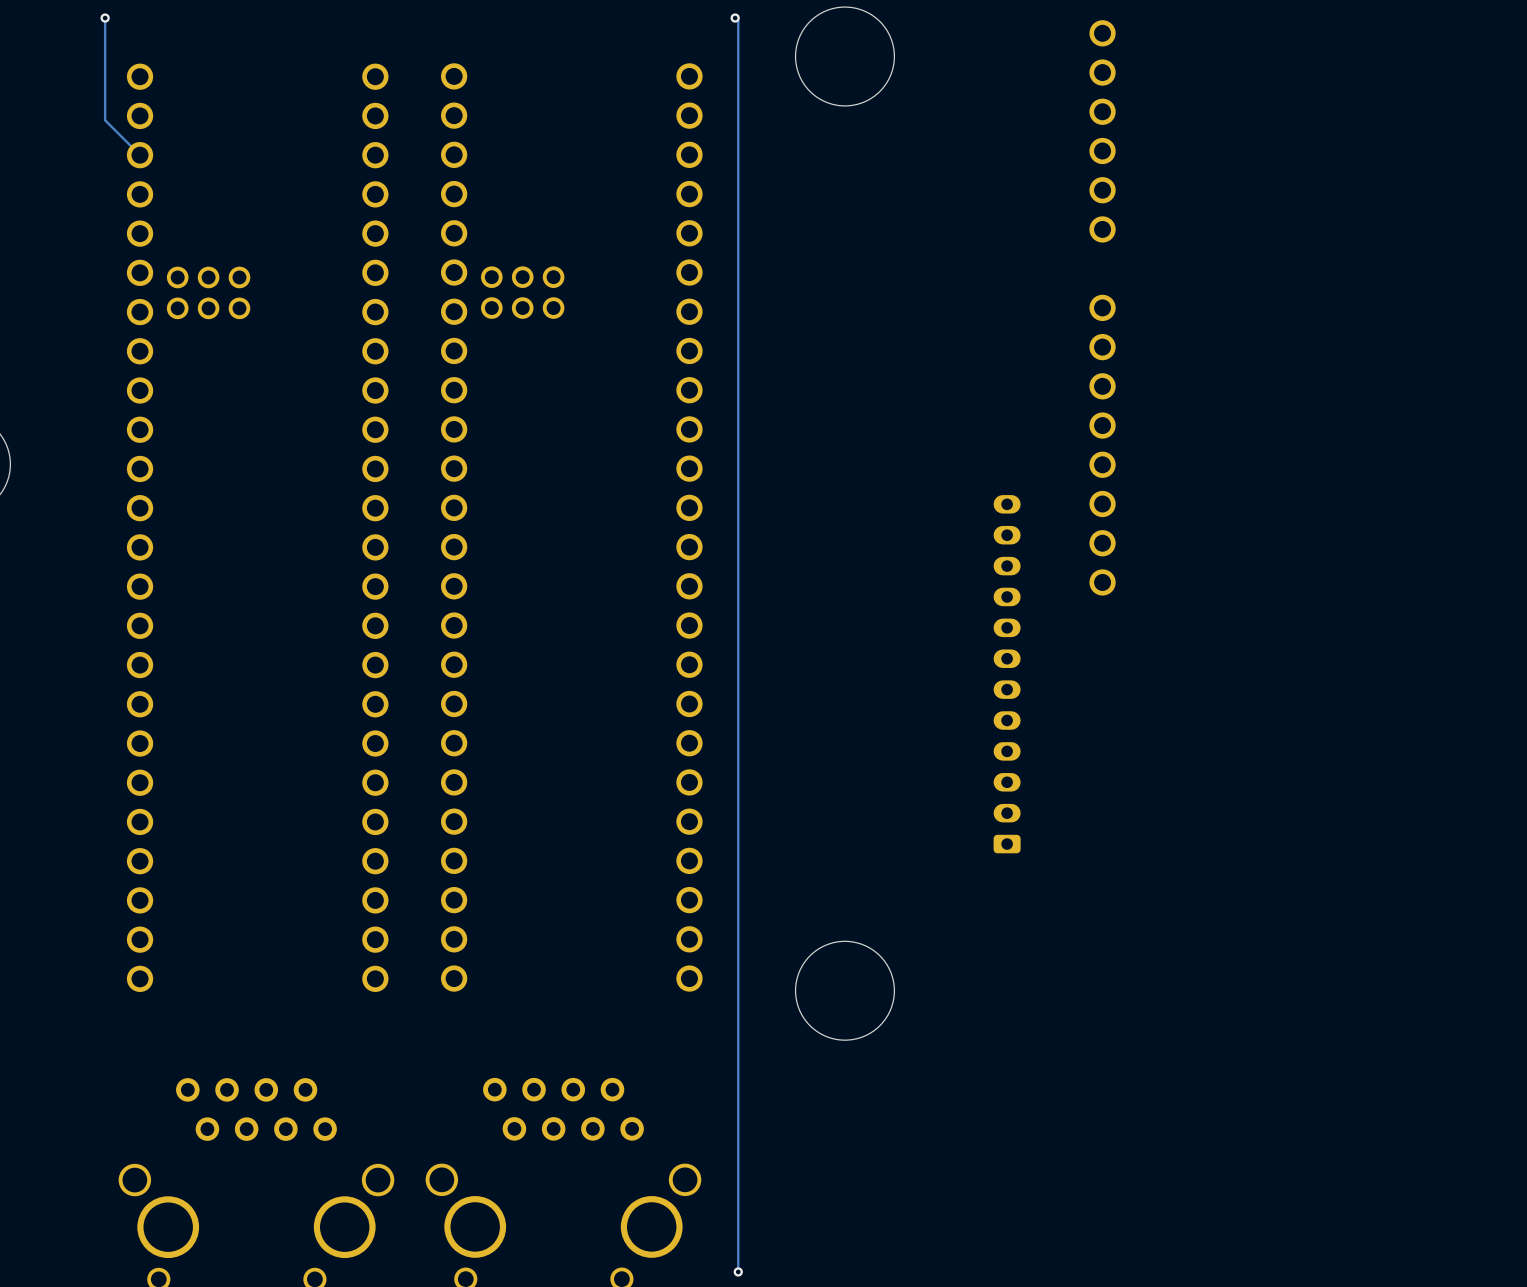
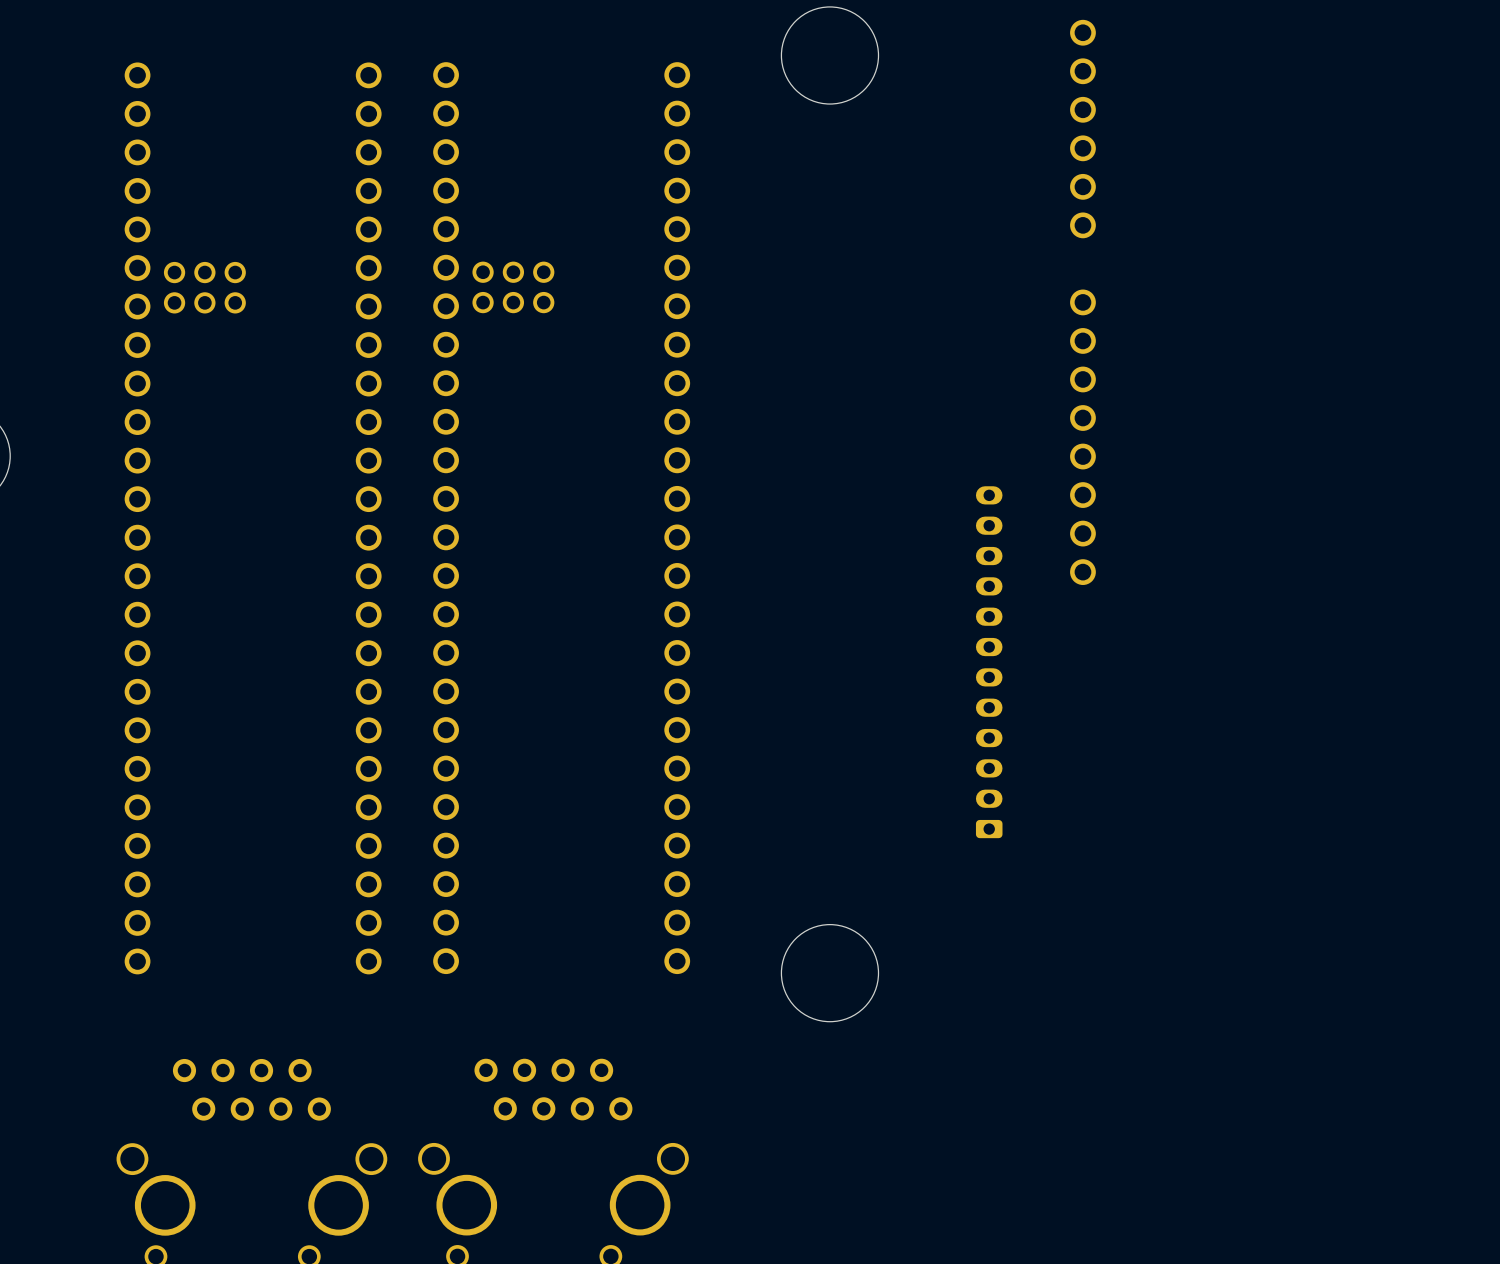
track: (105, 18) (105, 120) (140, 155) -> none
via: (105, 18) -> none
track: (735, 18) (738, 21) (738, 1271) -> none
via: (735, 18) -> none
via: (738, 1271) -> none

